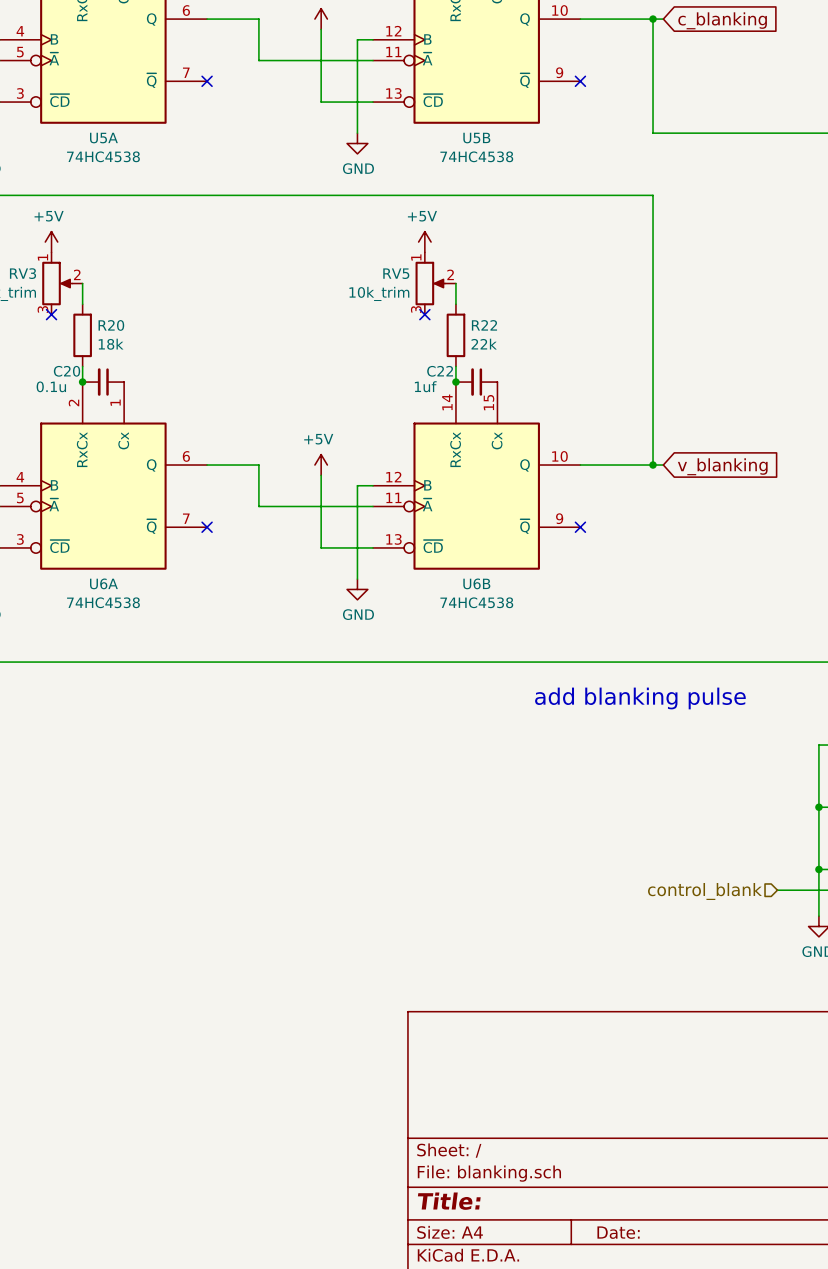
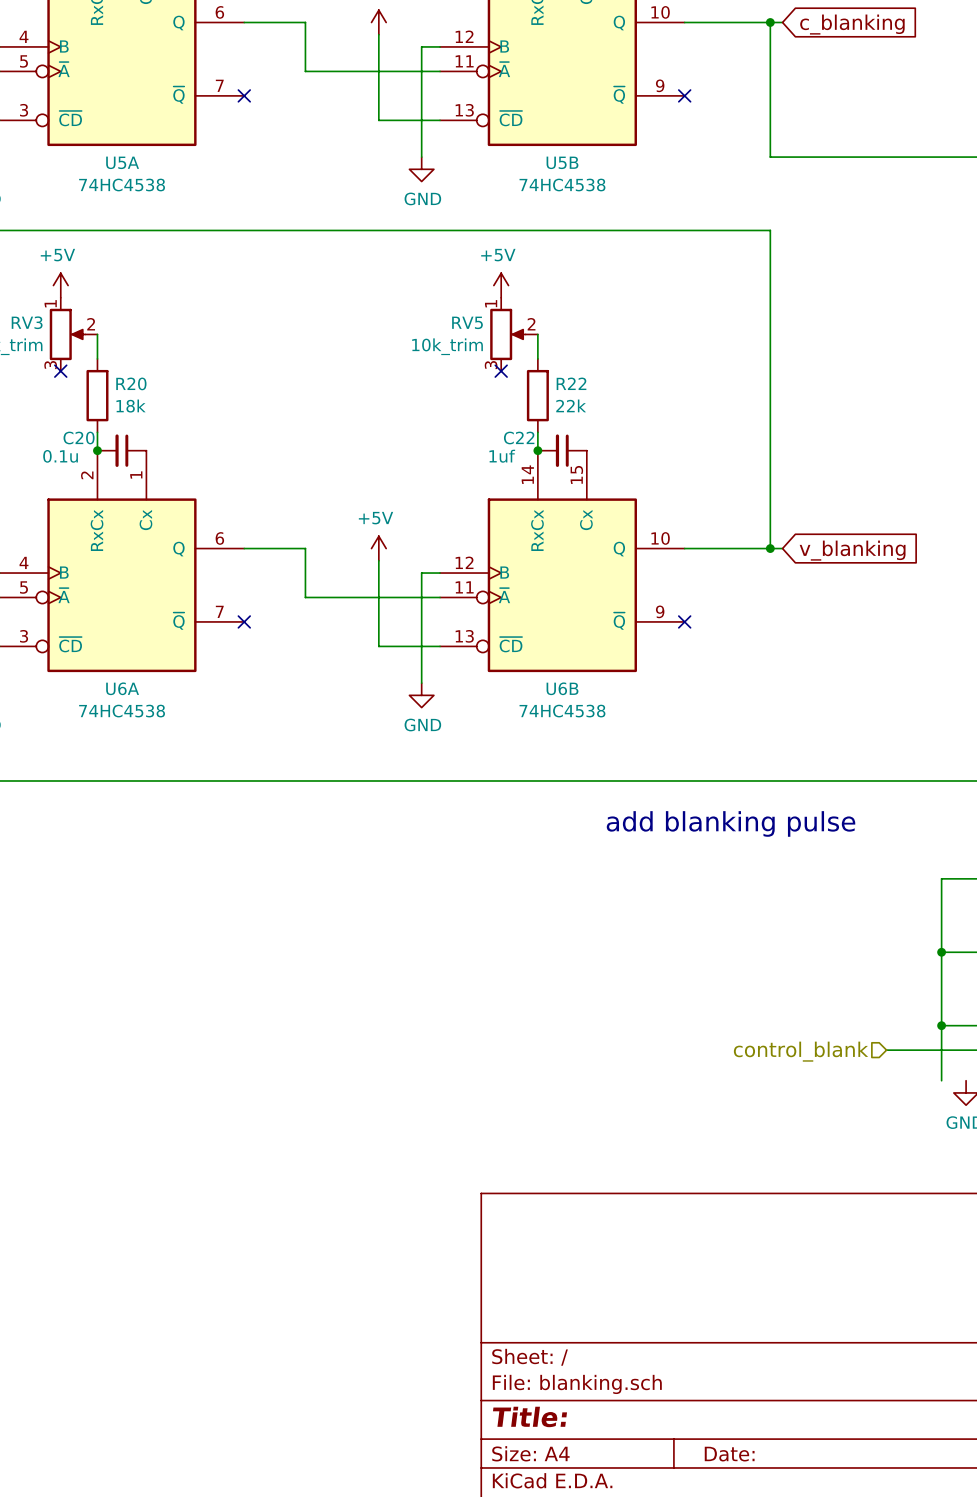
text position: add blanking pulse (640, 698) -> add blanking pulse (731, 823)
wire: (818, 745) (818, 916) -> (966, 878) (941, 878) (941, 1080)
wire: none -> (941, 952) (966, 952)
junction position: (818, 807) -> (941, 952)
wire: none -> (941, 1025) (966, 1025)
junction position: (818, 869) -> (941, 1025)
wire: none -> (886, 1050) (917, 1050)
hierarchical label position: control_blank (704, 891) -> control_blank (801, 1051)

